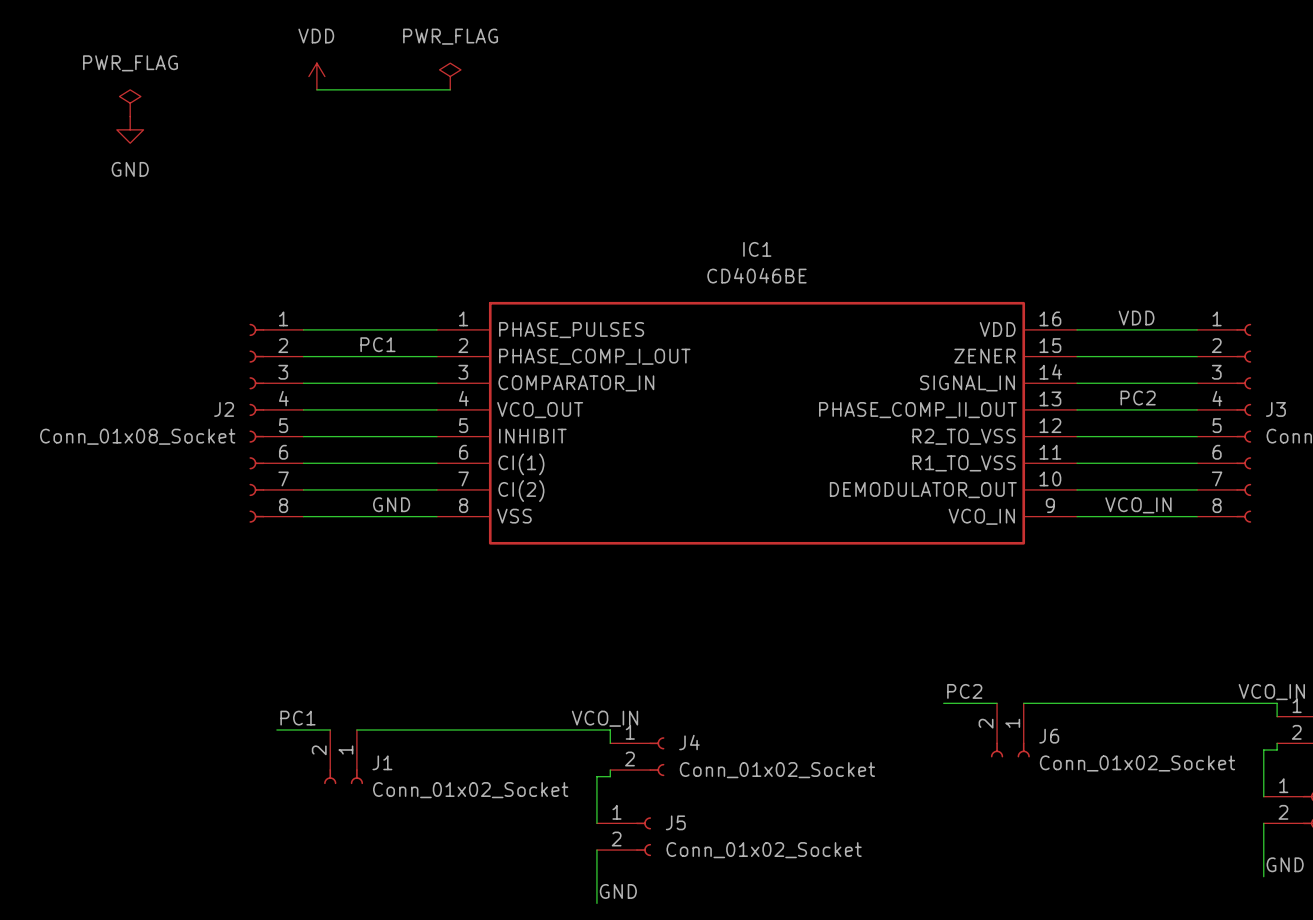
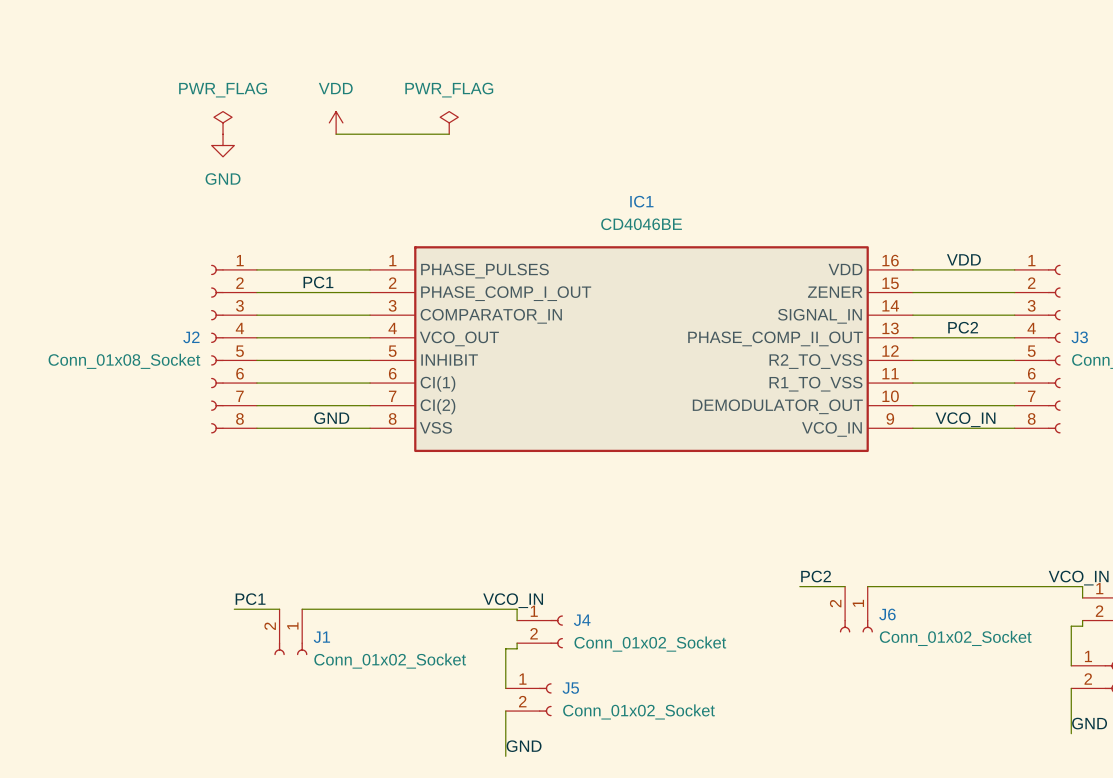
power symbol position: VDD (316, 76) -> VDD (336, 122)
power symbol: PWR_FLAG (450, 76) -> none
wire: (316, 89) (450, 89) -> (336, 134) (449, 134)
power symbol: PWR_FLAG (130, 103) -> none
power symbol position: GND (130, 129) -> GND (223, 145)
power symbol: none -> PWR_FLAG (223, 122)
power symbol: none -> PWR_FLAG (449, 122)

